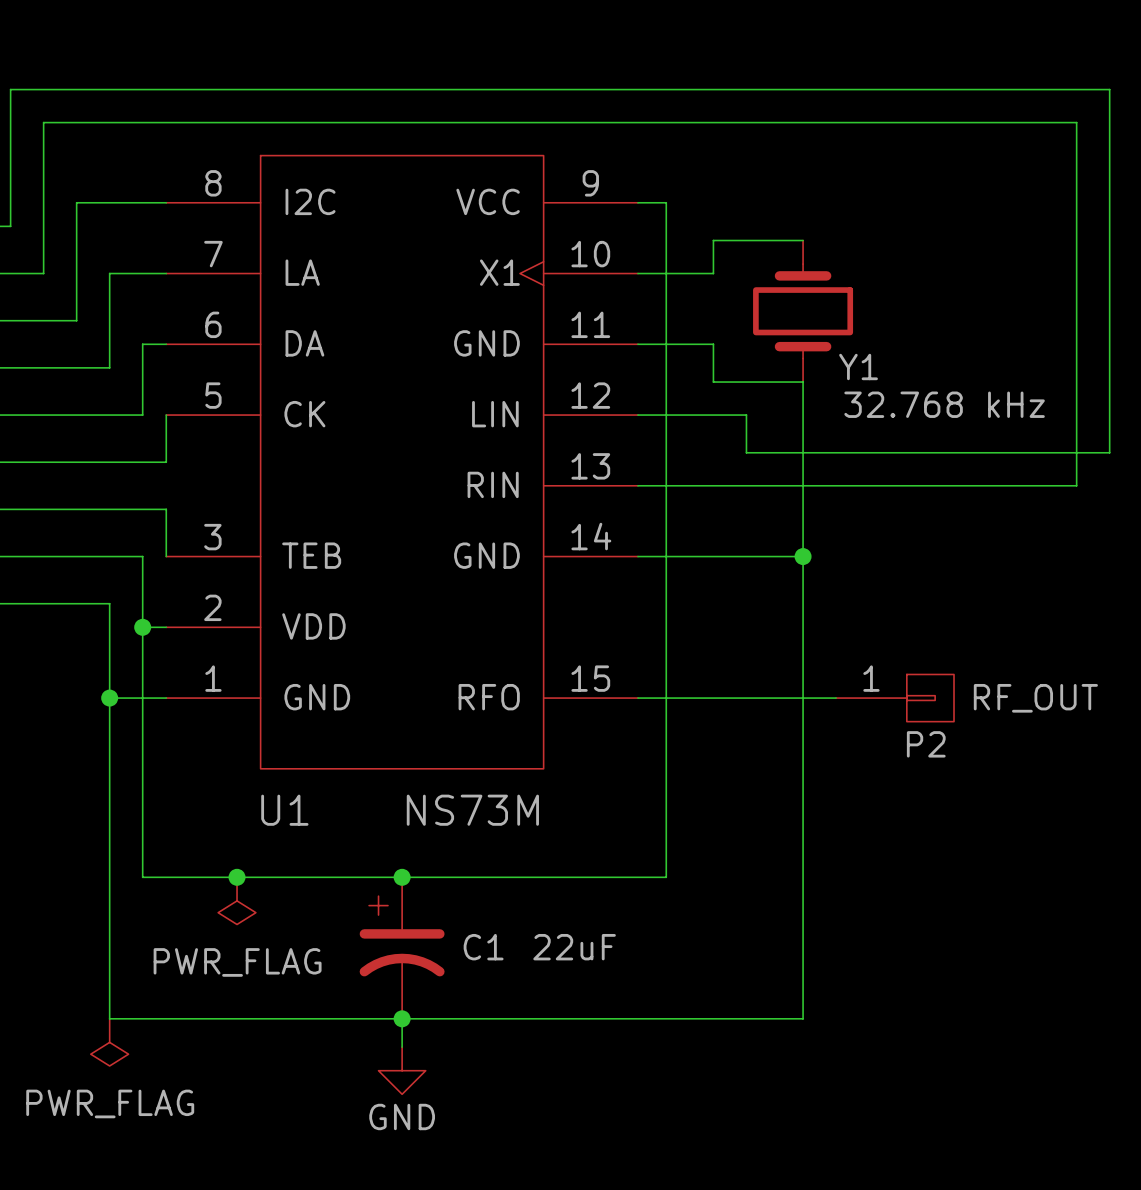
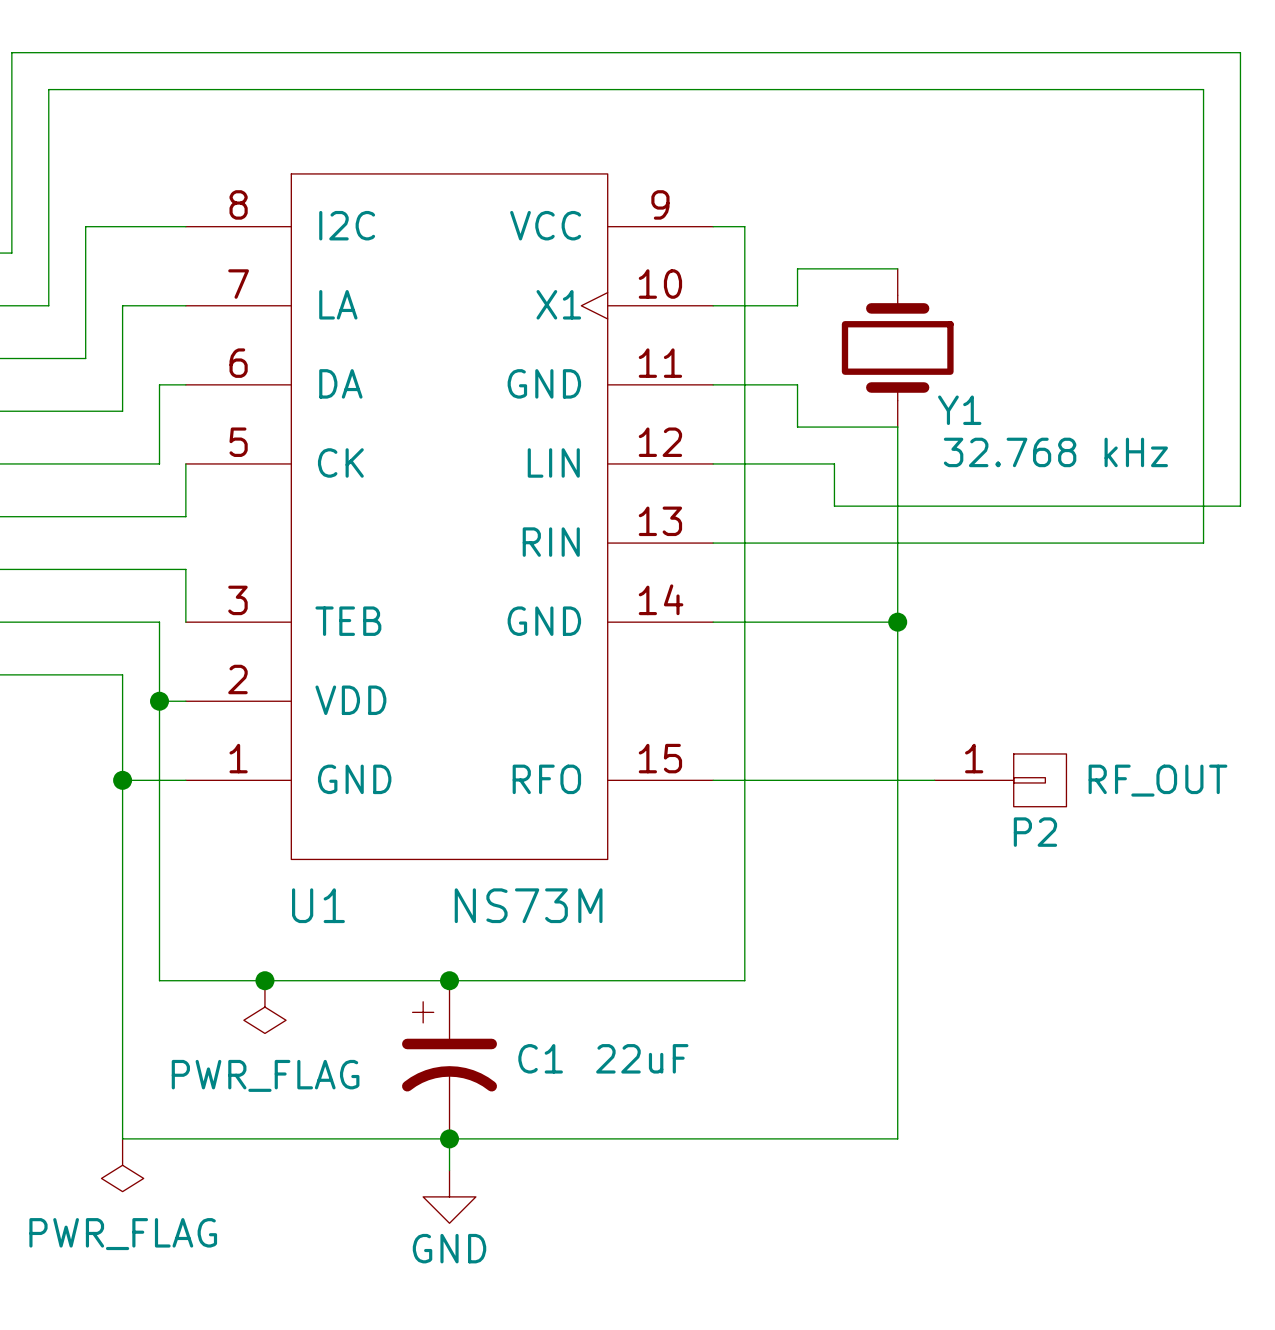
wire: (10, 89) (1109, 89) -> (11, 100) (11, 52) (1240, 52) (1240, 100)
wire: (43, 122) (1076, 122) -> (48, 137) (48, 89) (1203, 89) (1203, 137)

